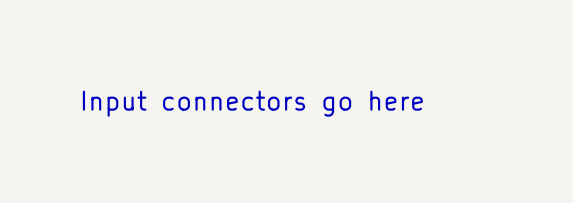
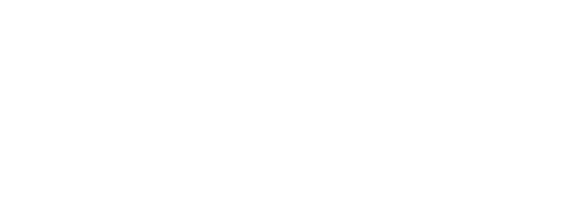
text: Input connectors go here (252, 103) -> none

